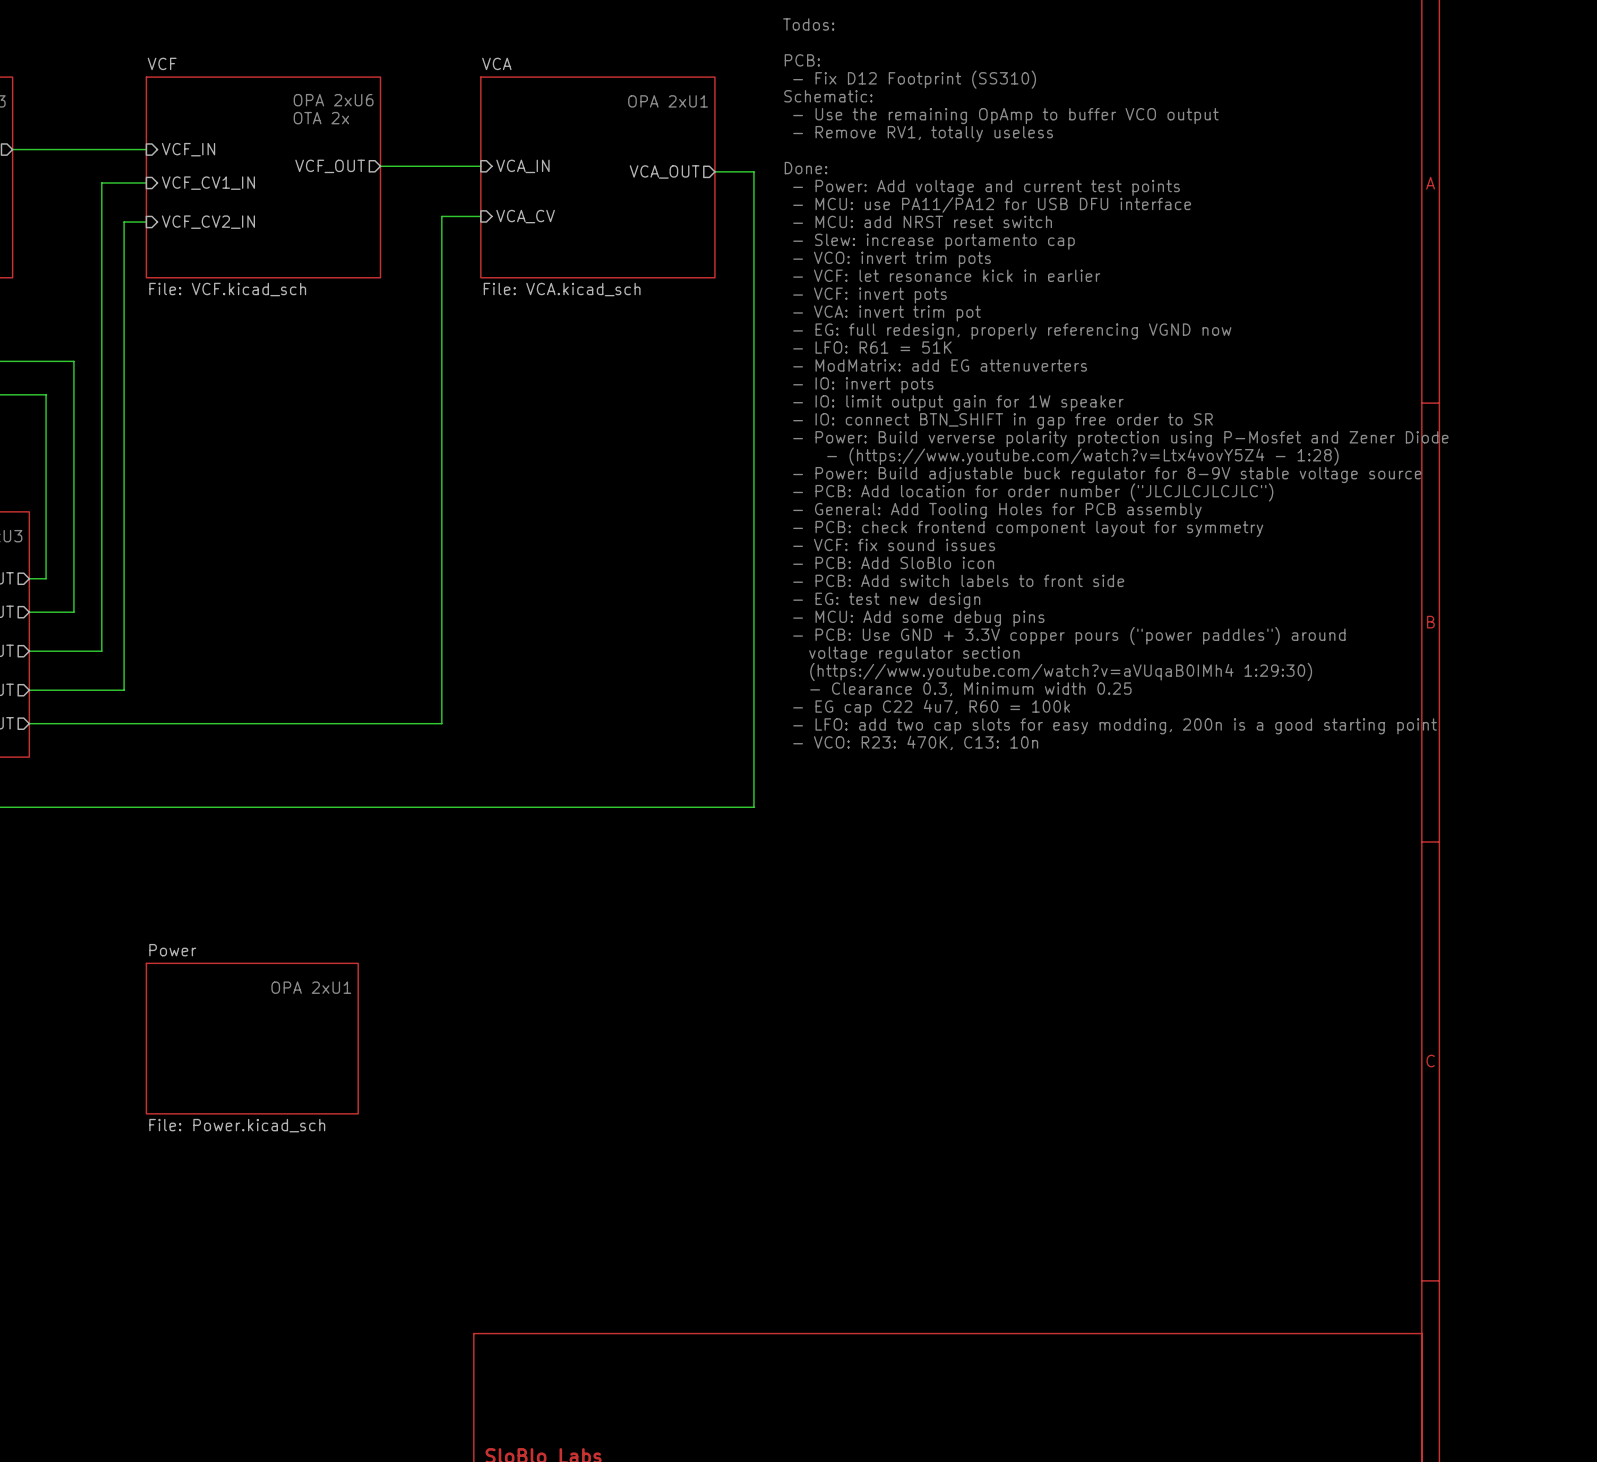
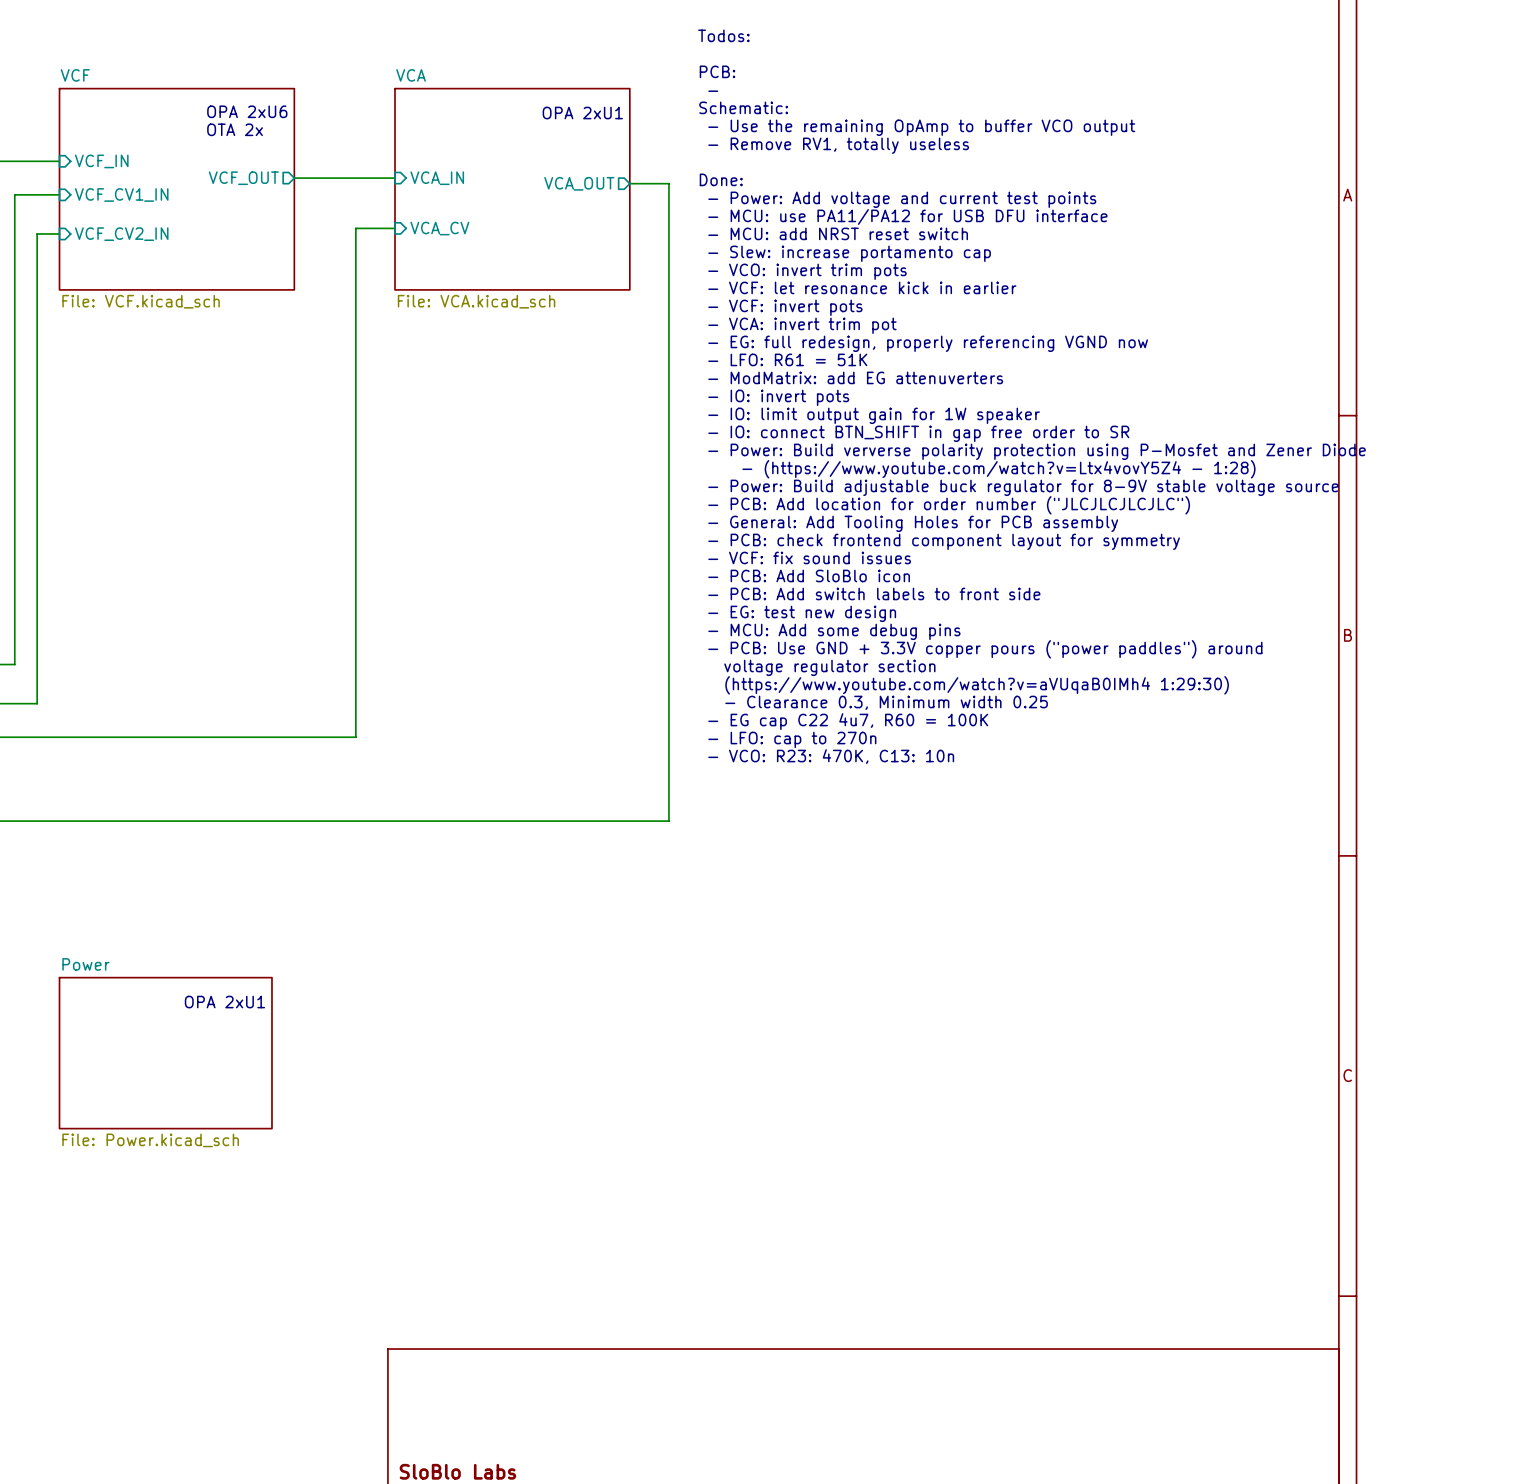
text: - Fix D12 Footprint (SS310) (914, 79) -> - (713, 91)
text: - EG cap C22 4u7, R60 = 100k (931, 708) -> - EG cap C22 4u7, R60 = 100K (848, 721)
text: - LFO: add two cap slots for easy modding, 200n is a good starting point (1115, 726) -> - LFO: cap to 270n (792, 739)

